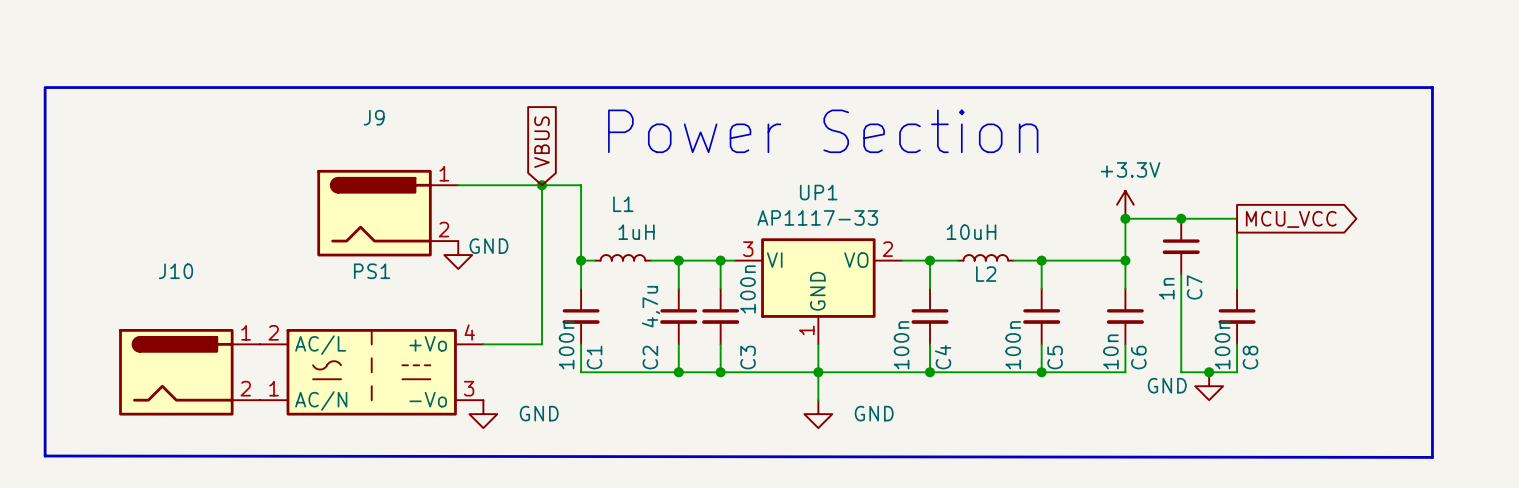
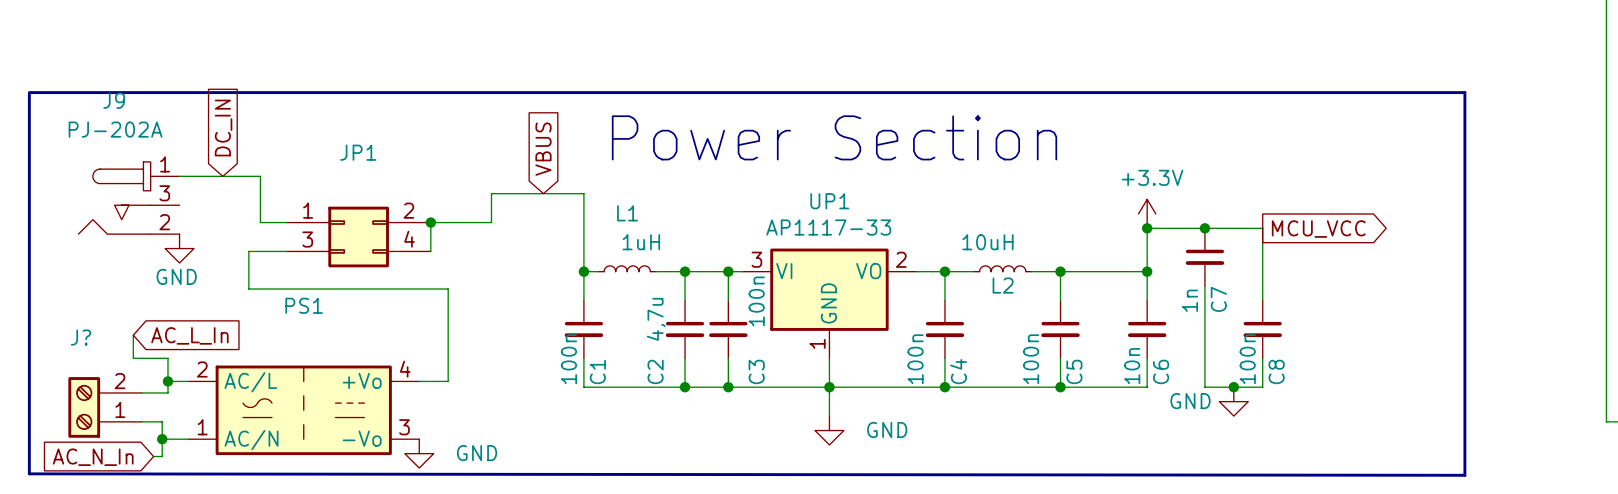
global label: none -> DC_IN (223, 128)
J9 value: none -> PJ-202A (115, 129)
wire: none -> (179, 176) (260, 176) (260, 222) (286, 222)
J9 symbol: [317, 169, 459, 257] -> [78, 161, 180, 235]
wire: (458, 185) (491, 185) -> (430, 251) (430, 222) (491, 222) (491, 193)
wire: (542, 185) (542, 344) (483, 344) -> none
junction: (542, 185) -> none
junction: none -> (430, 222)
JP1: none -> (358, 237)
power symbol: none -> GND (179, 248)
wire: none -> (286, 251) (248, 251) (248, 288) (448, 288) (448, 381) (419, 381)
power symbol: GND (458, 255) -> none
global label: none -> AC_L_In (189, 335)
junction: none -> (167, 381)
J10: (189, 372) -> none
PS1 position: (371, 372) -> (303, 410)
J?: none -> (105, 407)
wire: none -> (142, 421) (162, 421) (162, 456) (153, 456)
power symbol position: GND (483, 414) -> GND (419, 453)
wire: none -> (162, 439) (188, 439)
junction: none -> (162, 439)
global label: none -> AC_N_In (93, 457)

